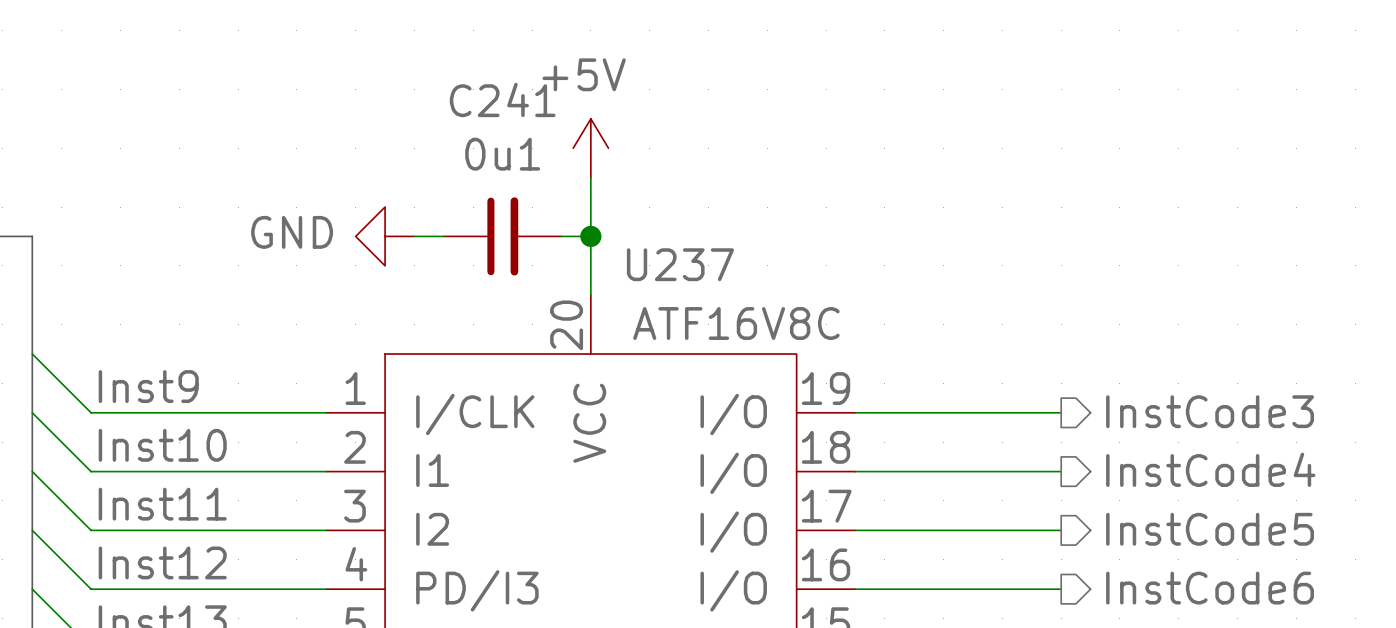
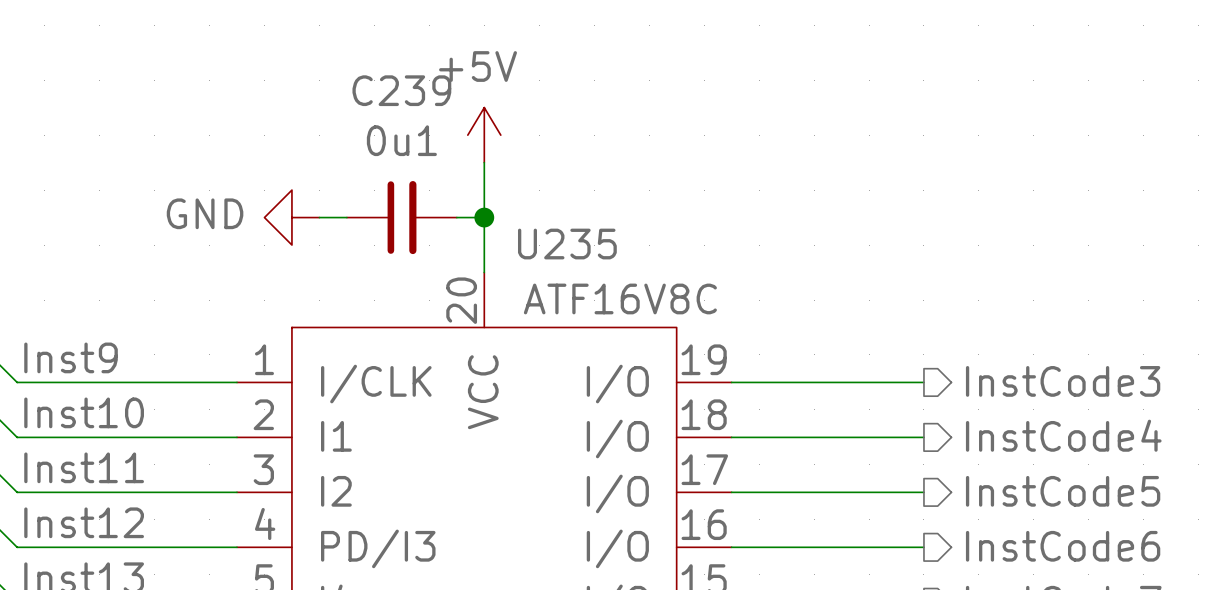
C241 name: C241 (502, 99) -> C239 (401, 90)
U237 name: U237 (680, 264) -> U235 (567, 244)

